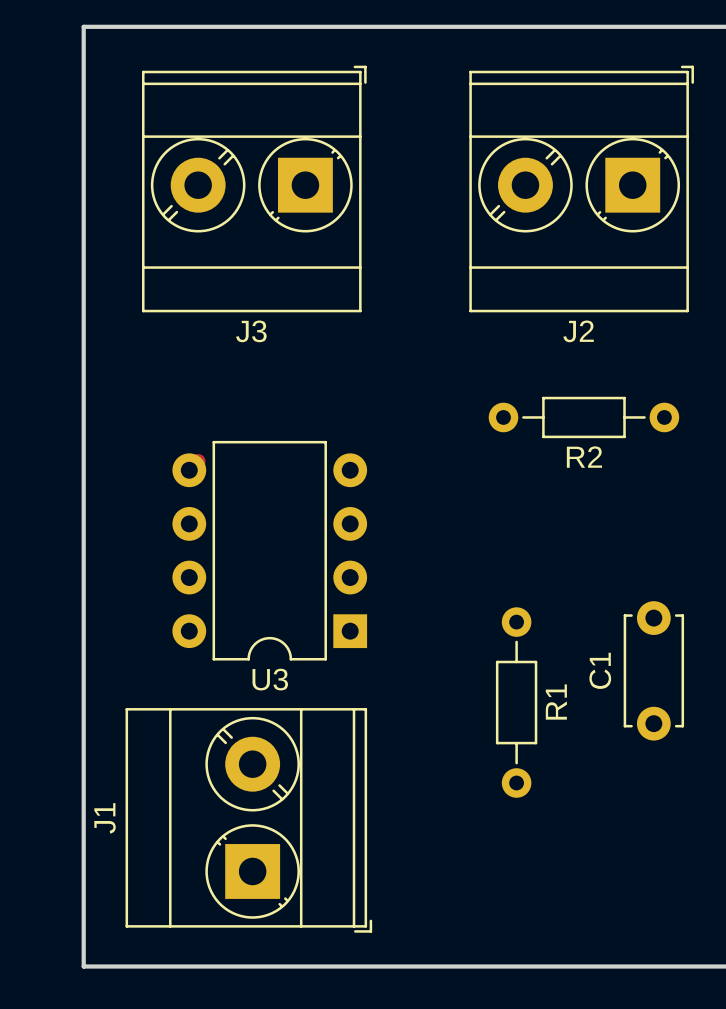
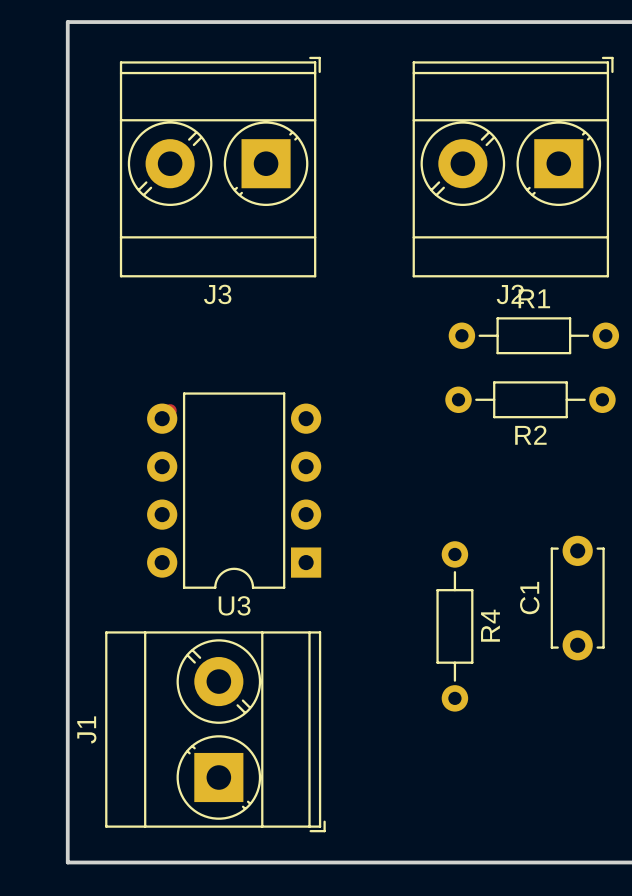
R1: none -> (533, 335)
R2 position: (583, 417) -> (530, 399)
R1 name: R1 (556, 702) -> R4 (490, 625)

